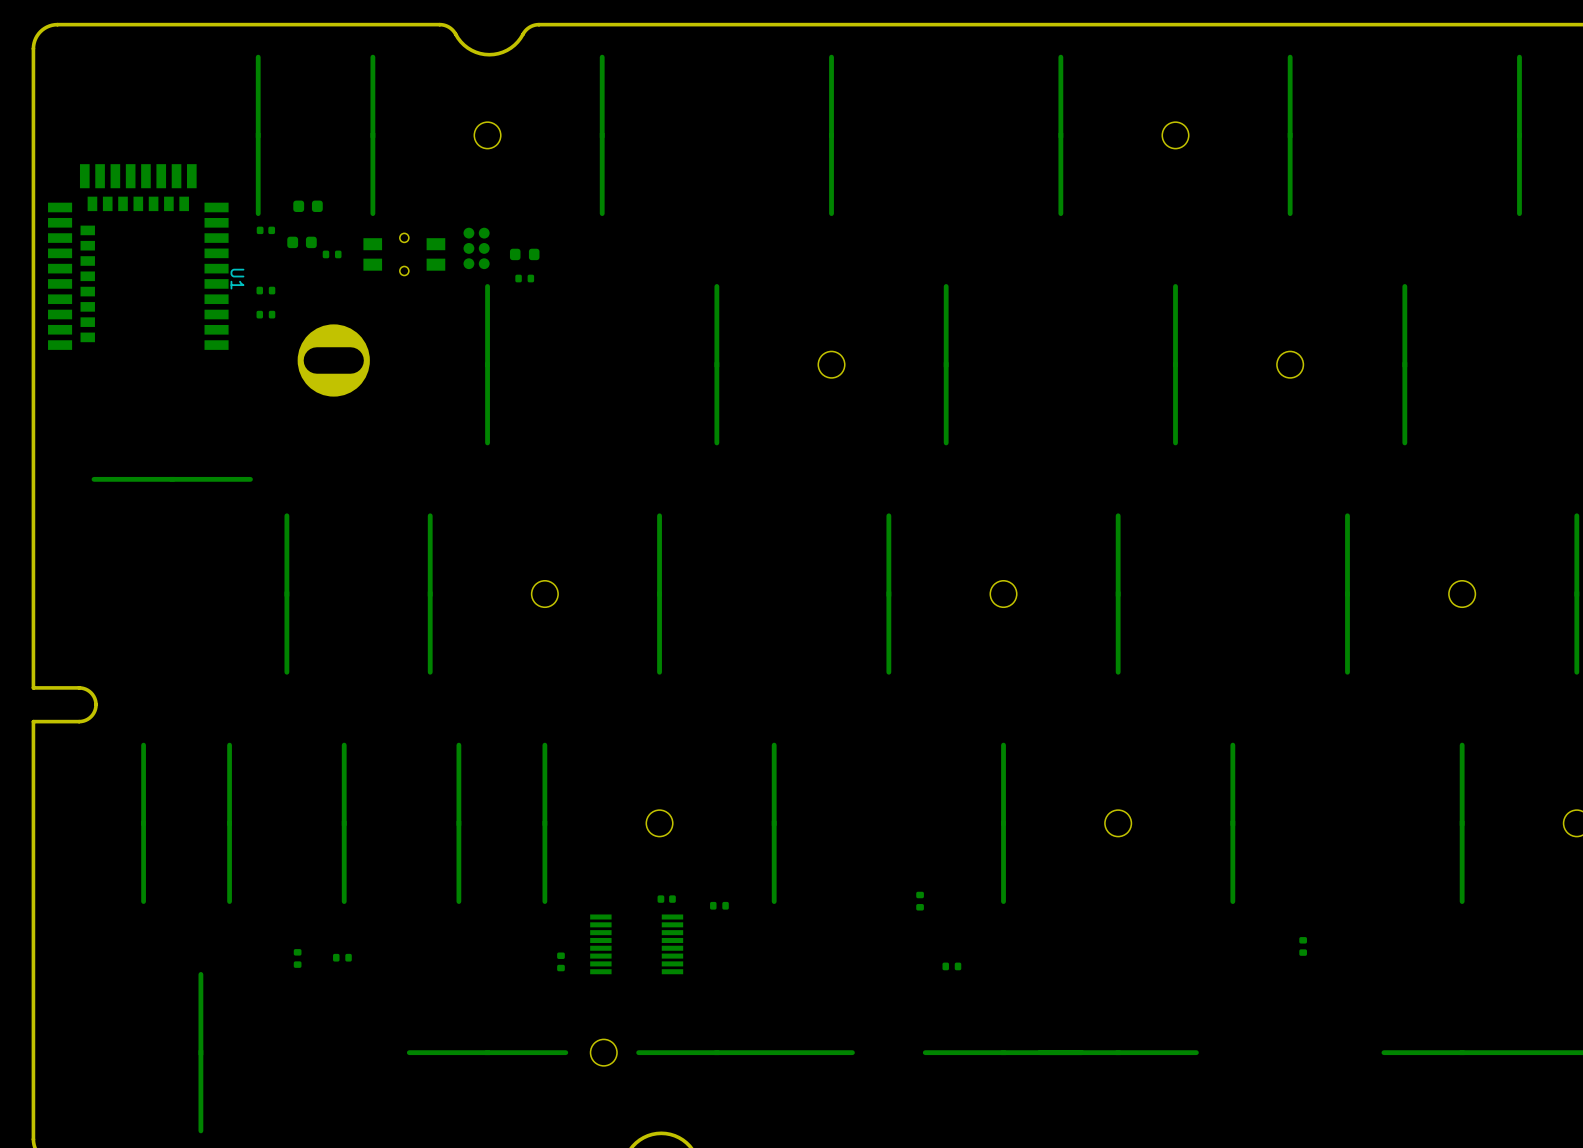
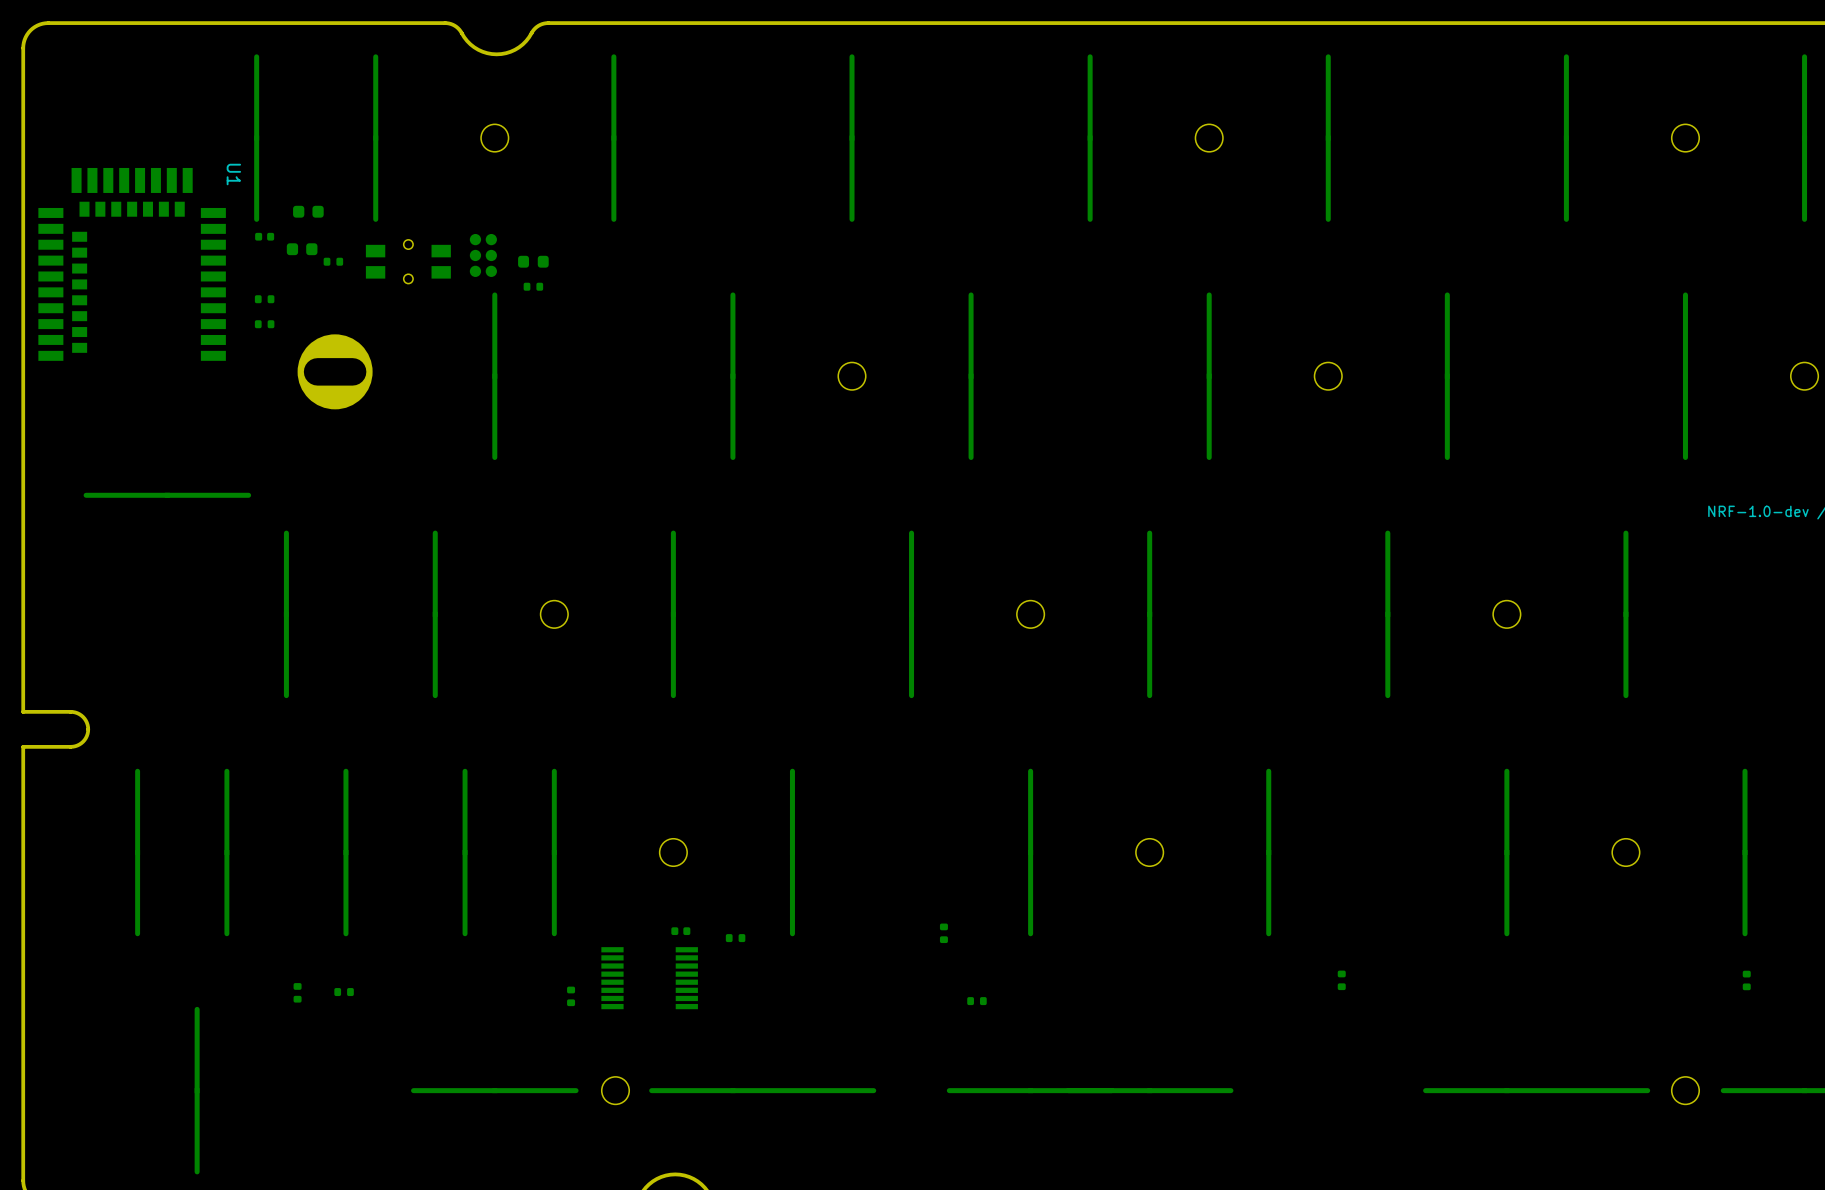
U1 name position: U1 (237, 279) -> U1 (233, 174)

